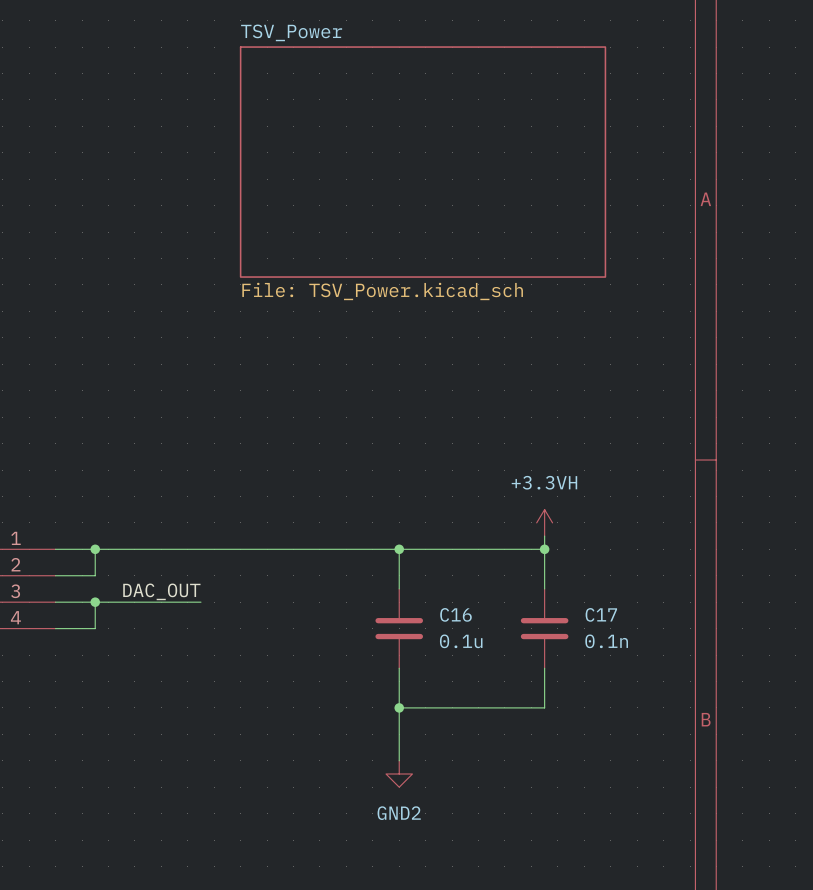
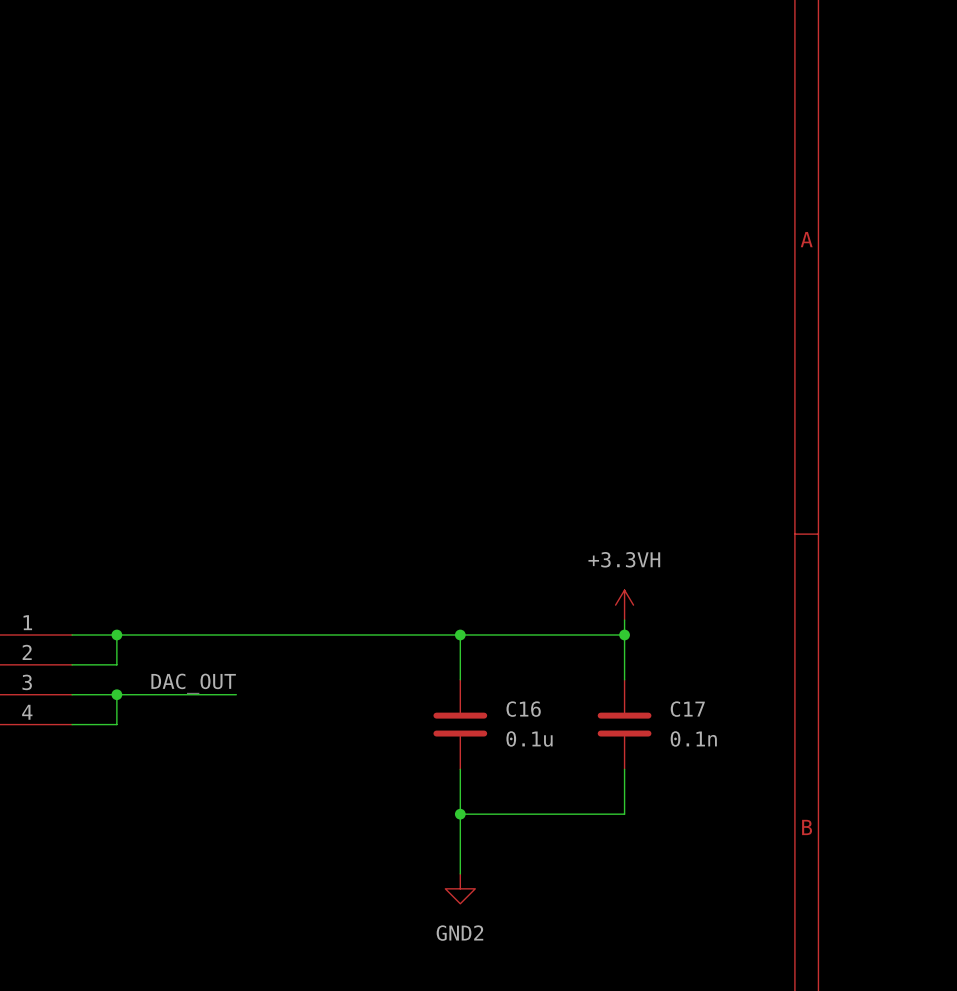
sheet TSV_Power: File: TSV_Power.kicad_sch (423, 162) -> none

